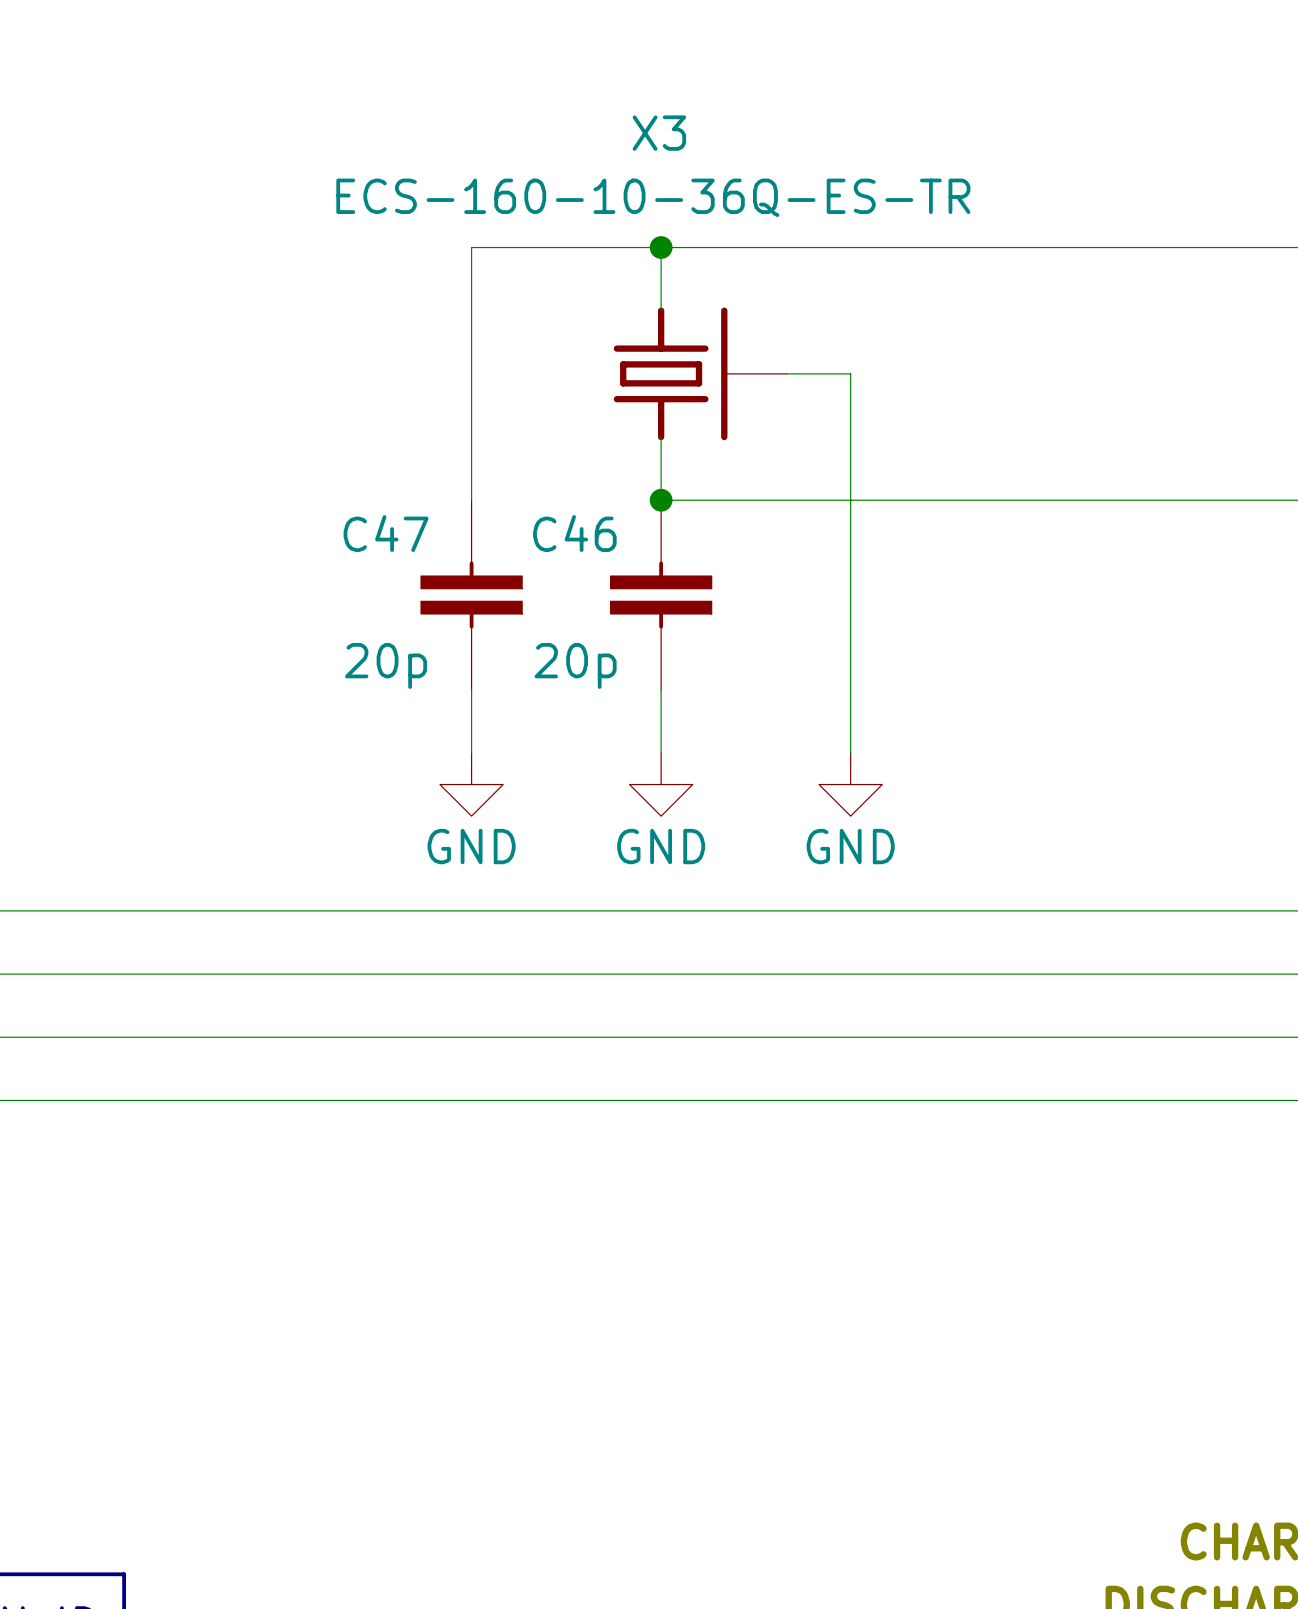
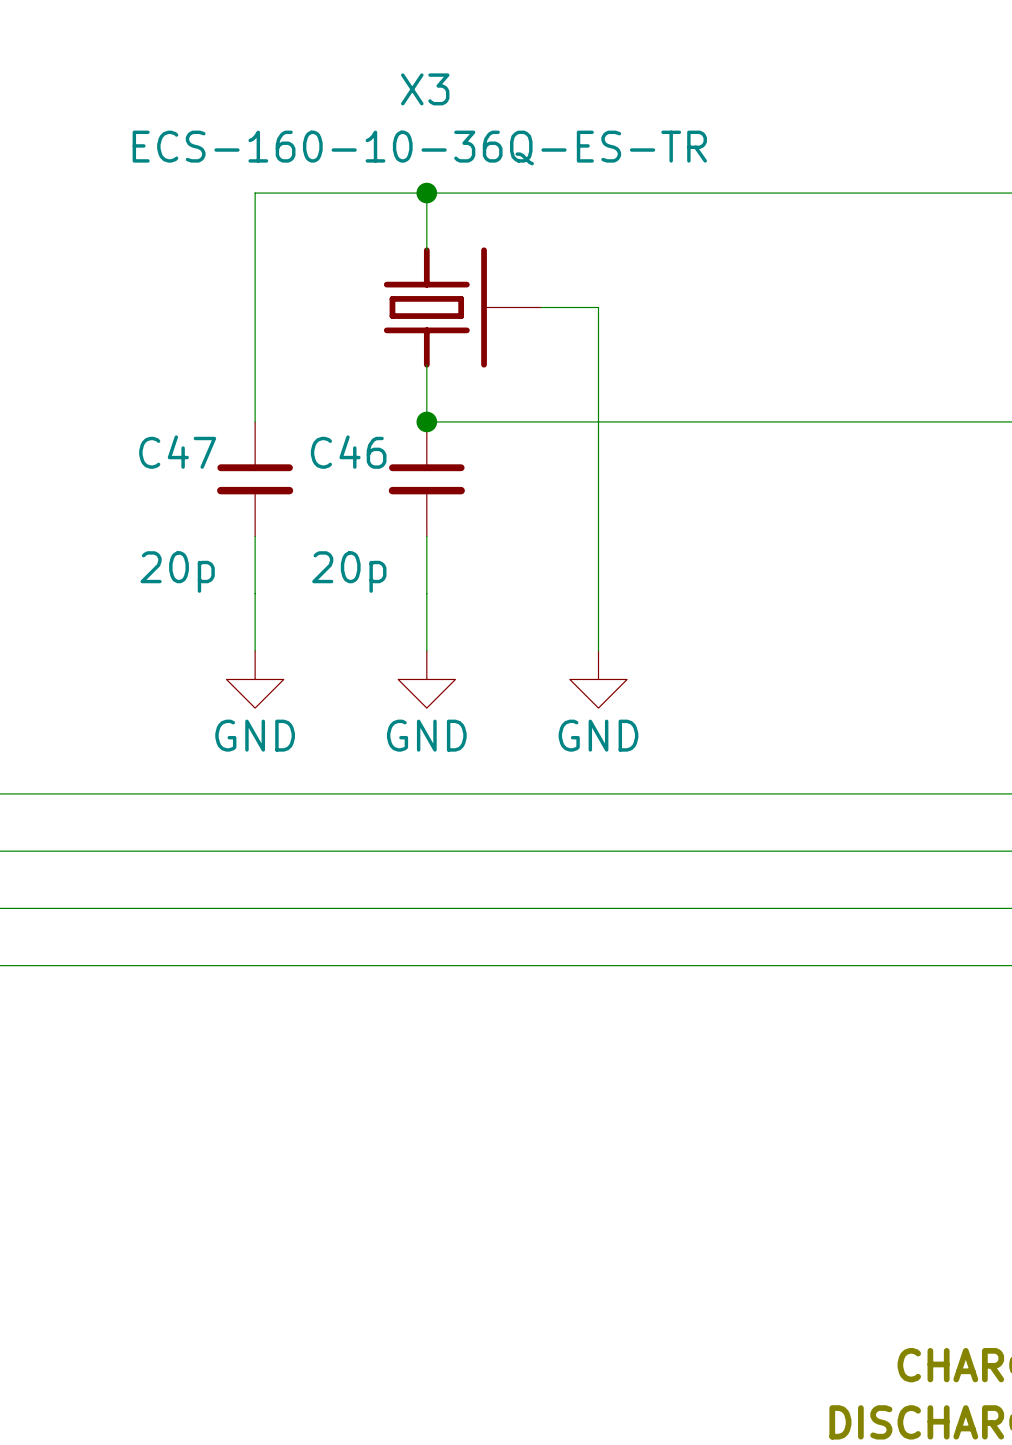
C47 symbol: [421, 500, 523, 690] -> [217, 421, 294, 537]
C46 symbol: [610, 500, 712, 690] -> [388, 421, 465, 537]

